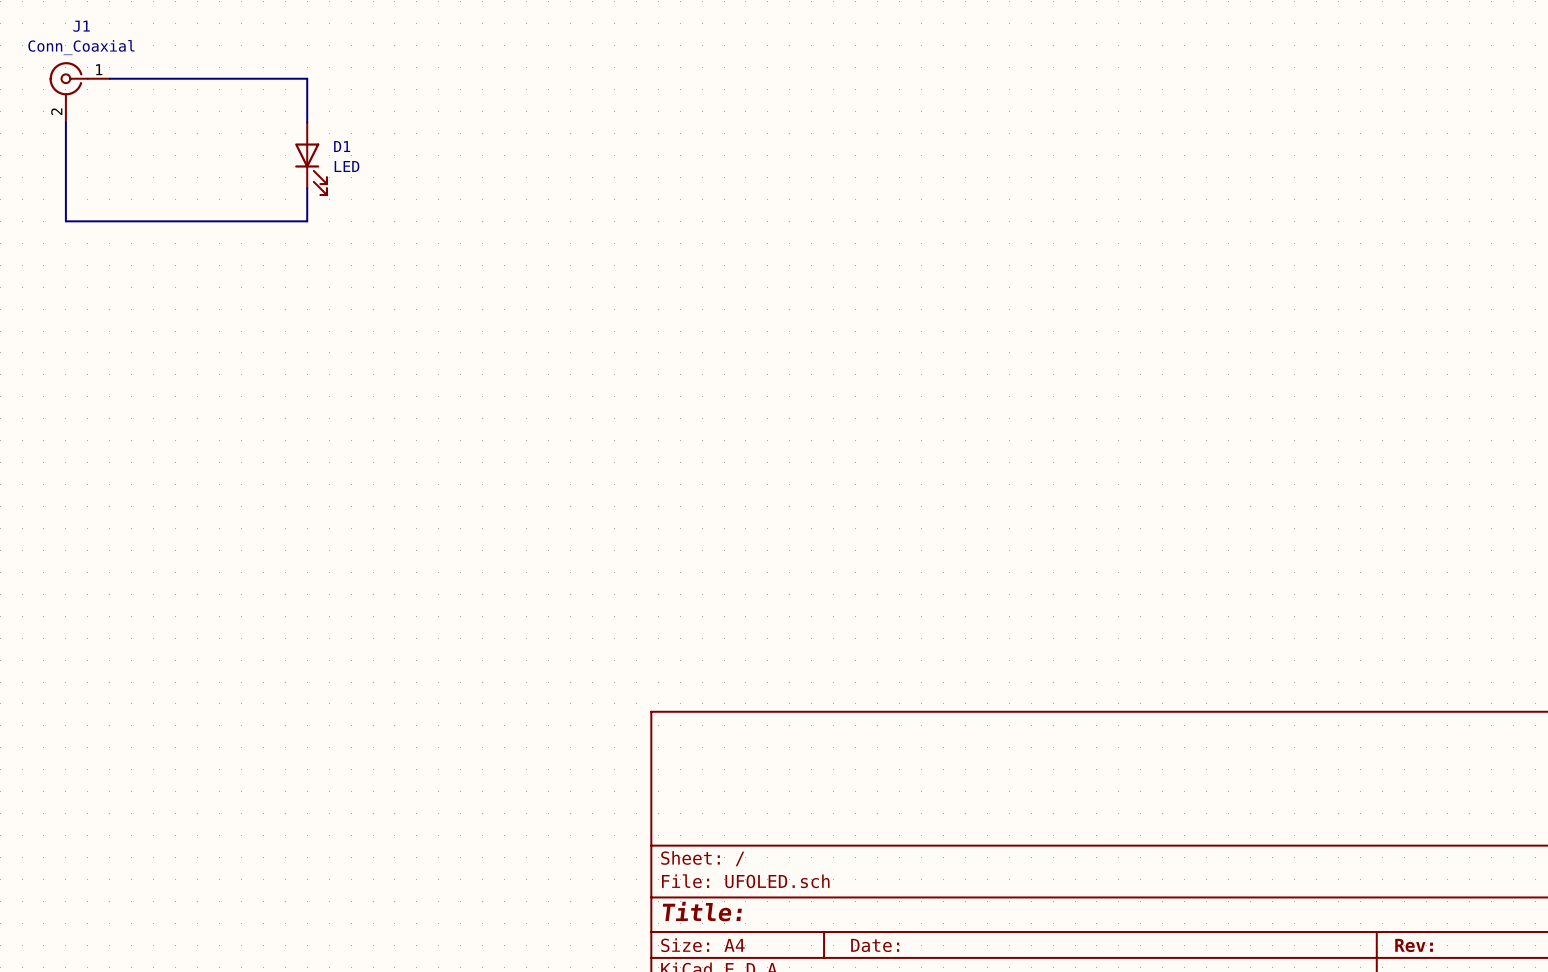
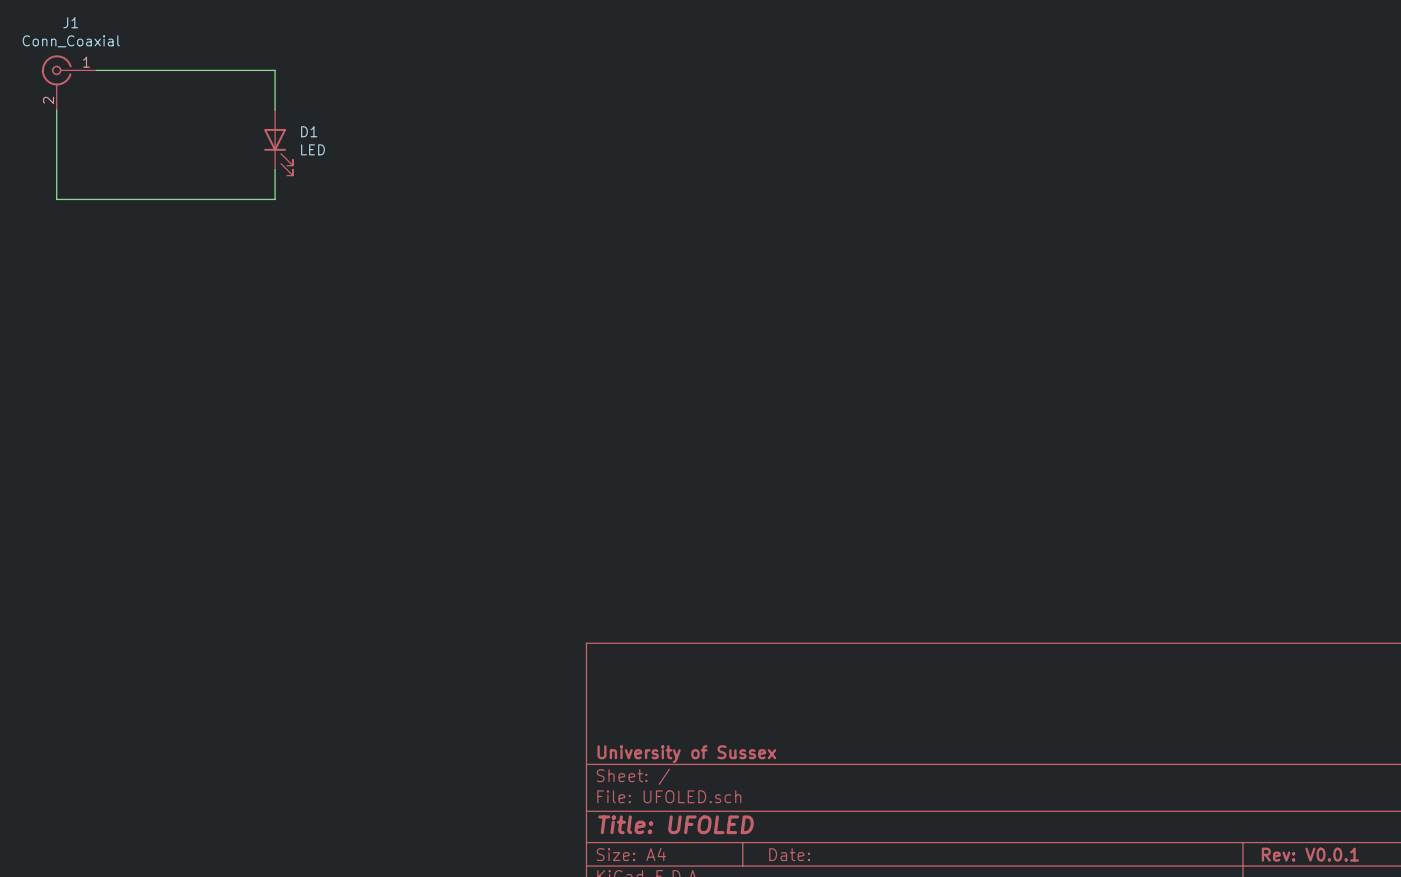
title block: none -> University of Sussex (686, 754)
title block: Title: (702, 911) -> Title: UFOLED (676, 824)
title block: Rev: (1414, 945) -> Rev: V0.0.1 (1310, 854)

